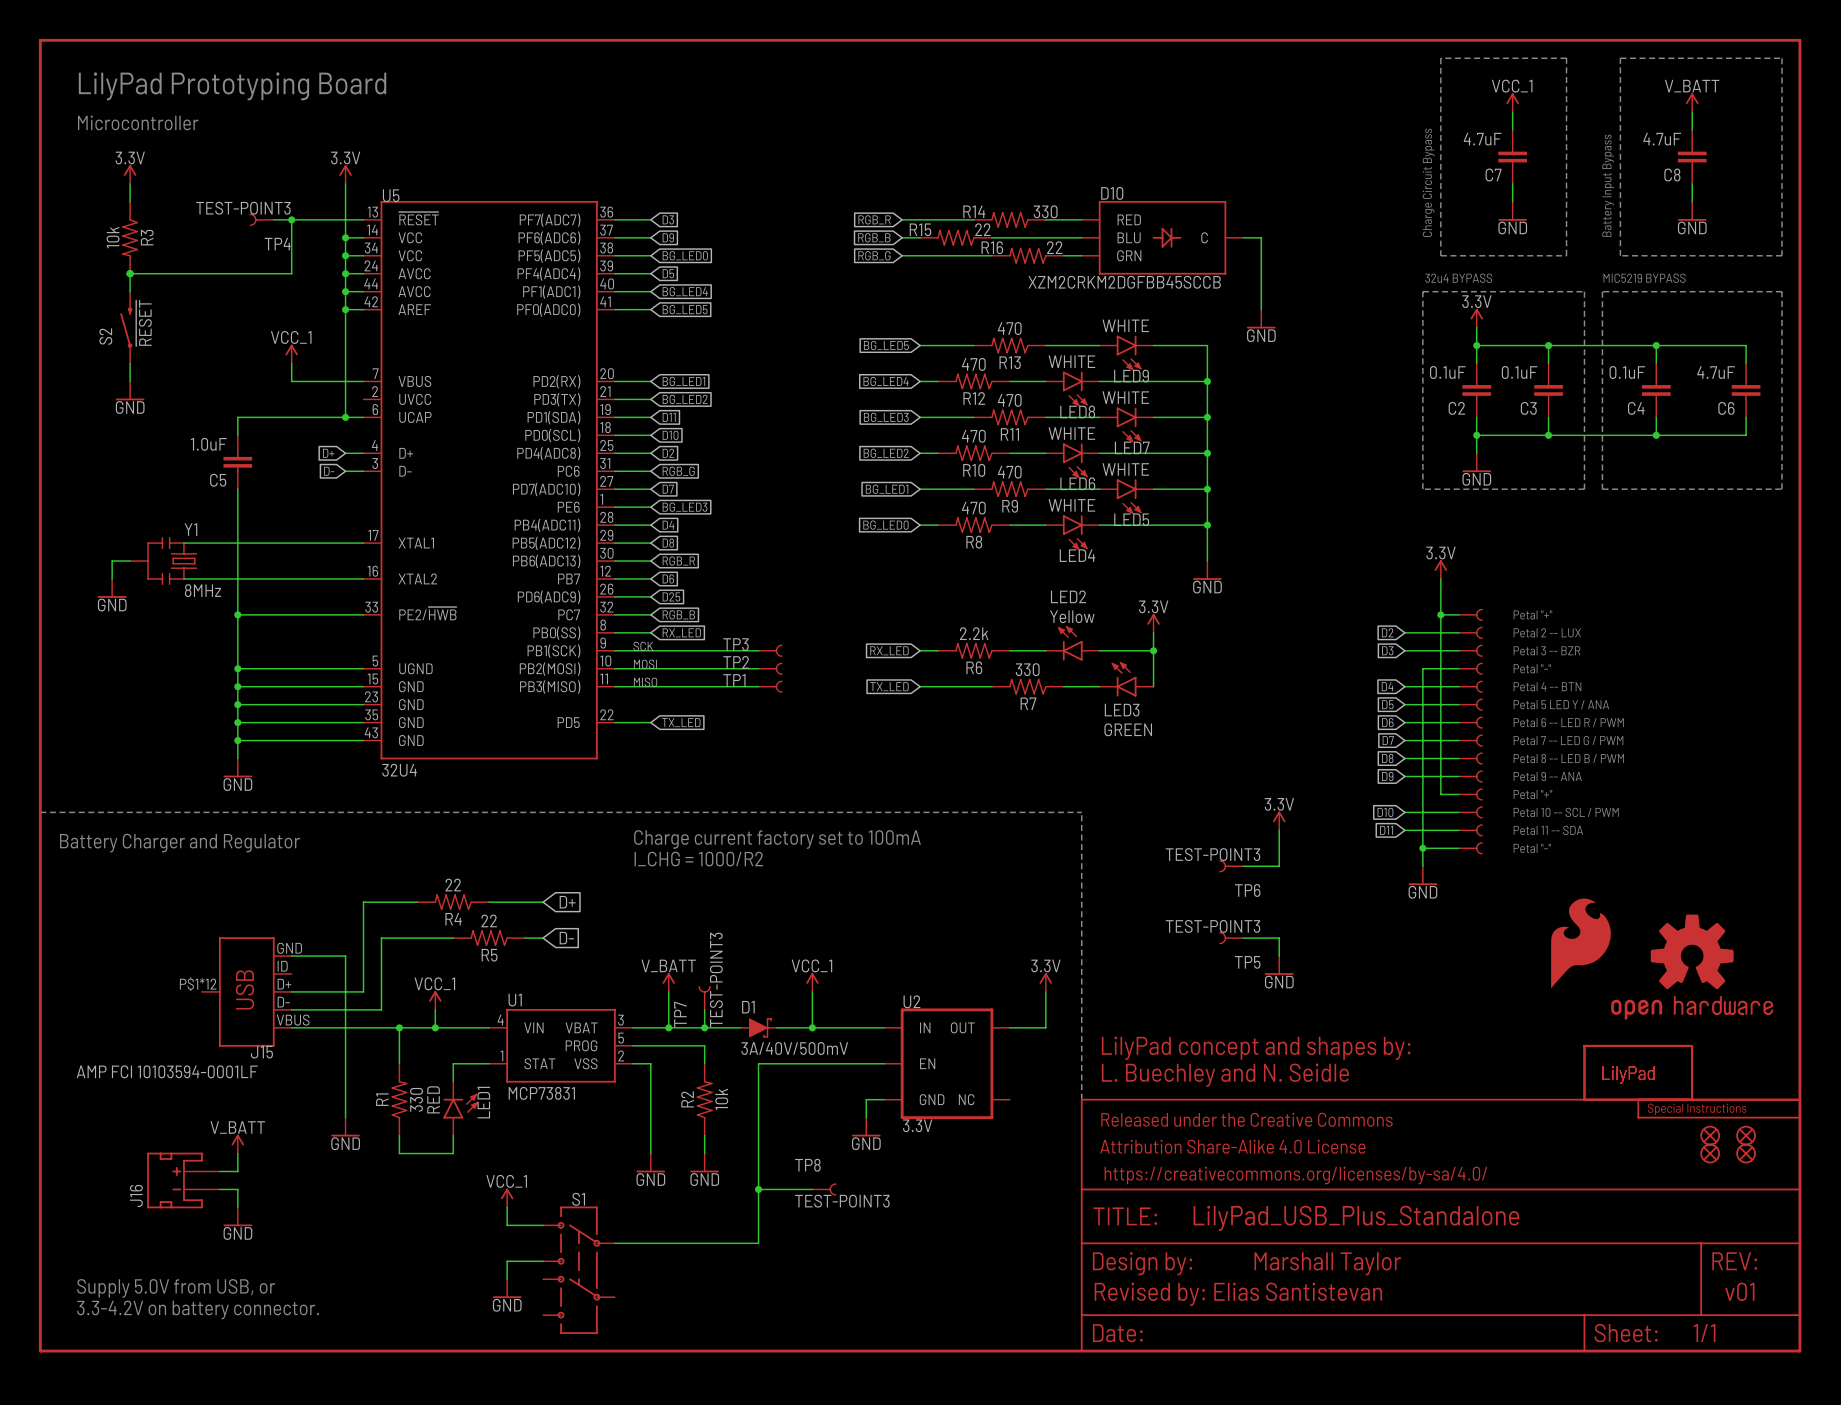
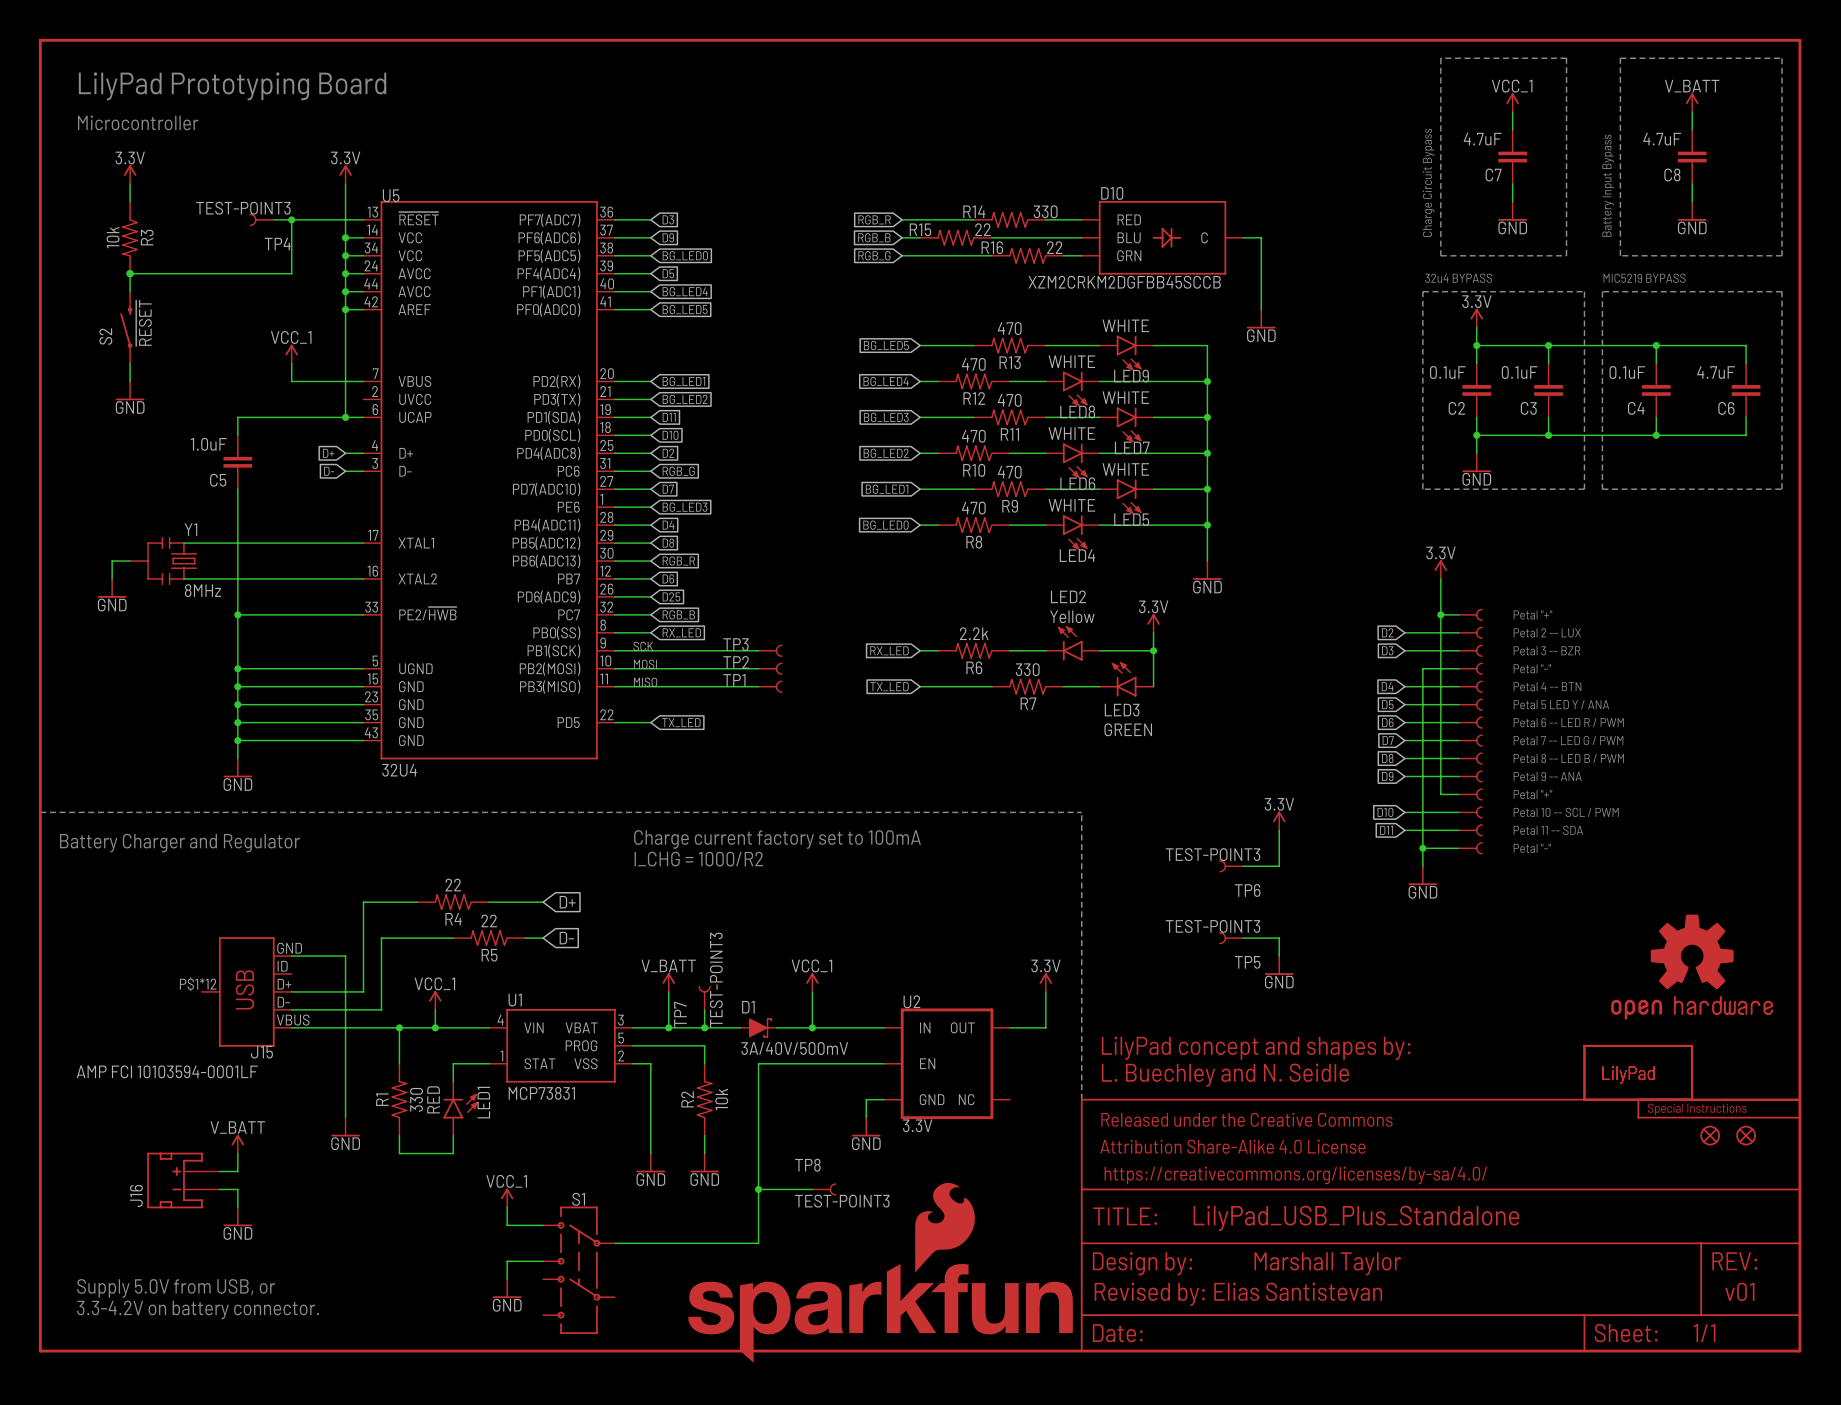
part: (1581, 943) -> none
part: (1710, 1153) -> none
part: (1746, 1153) -> none
part: none -> (880, 1272)

